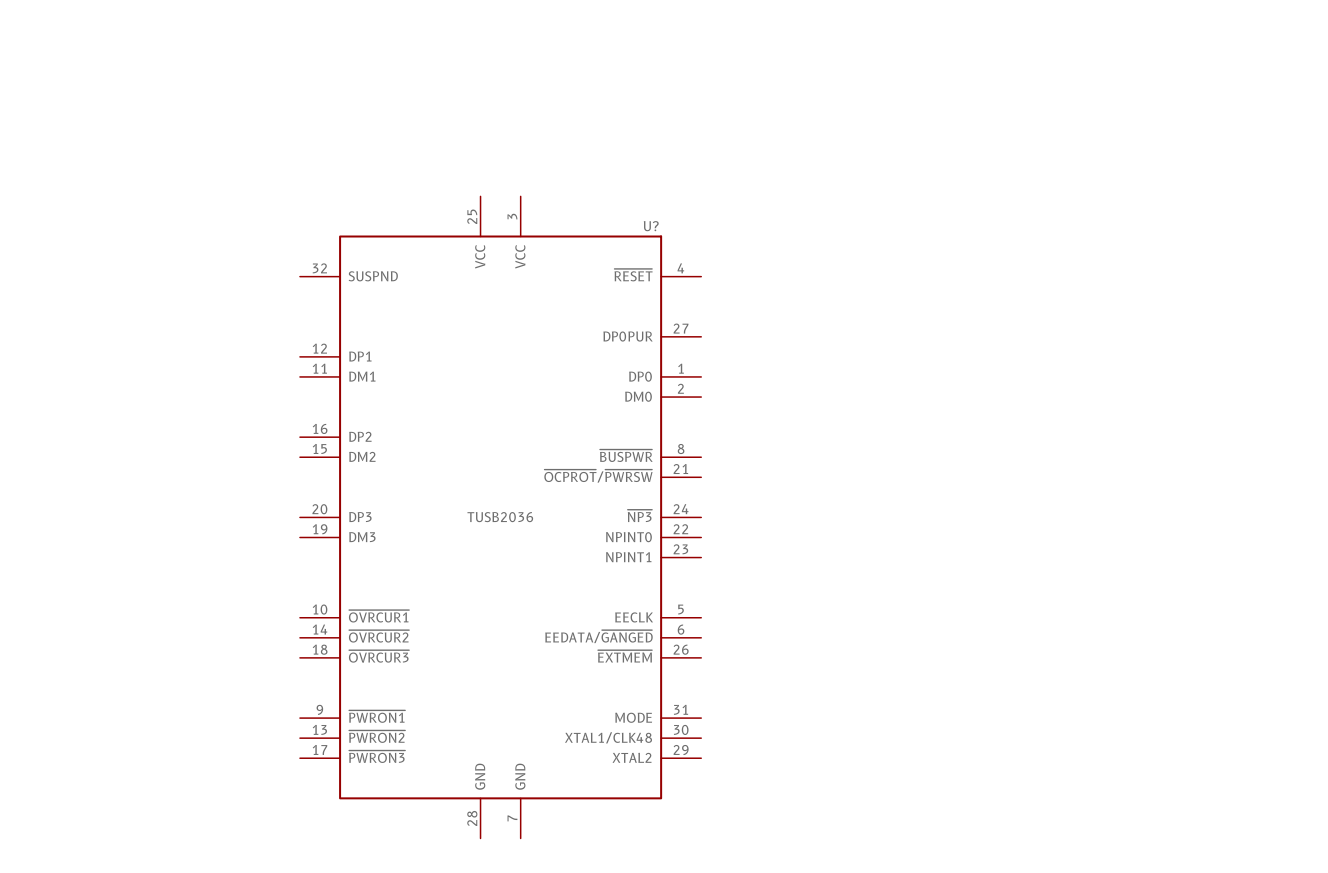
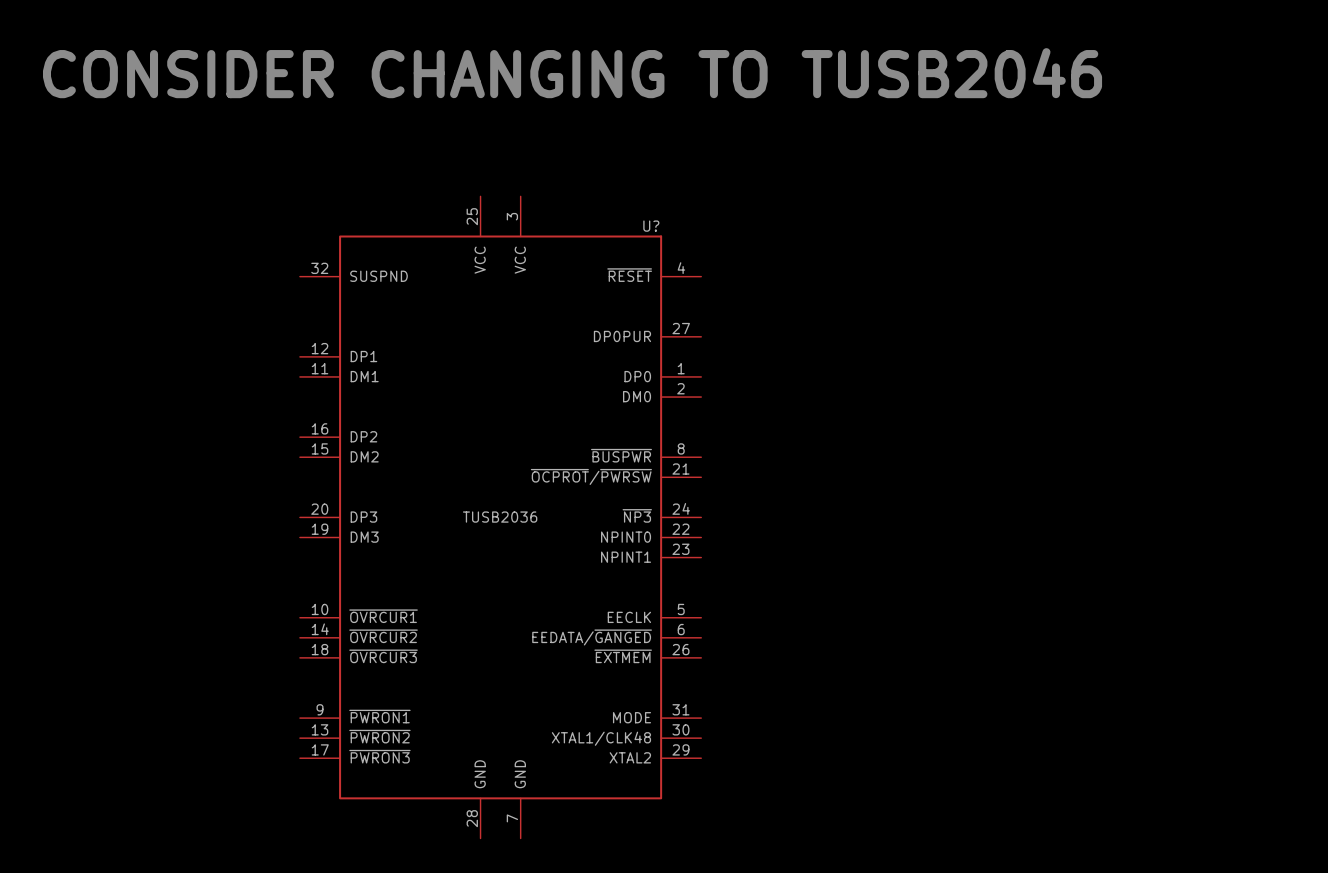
text: none -> CONSIDER CHANGING TO TUSB2046 (572, 73)

